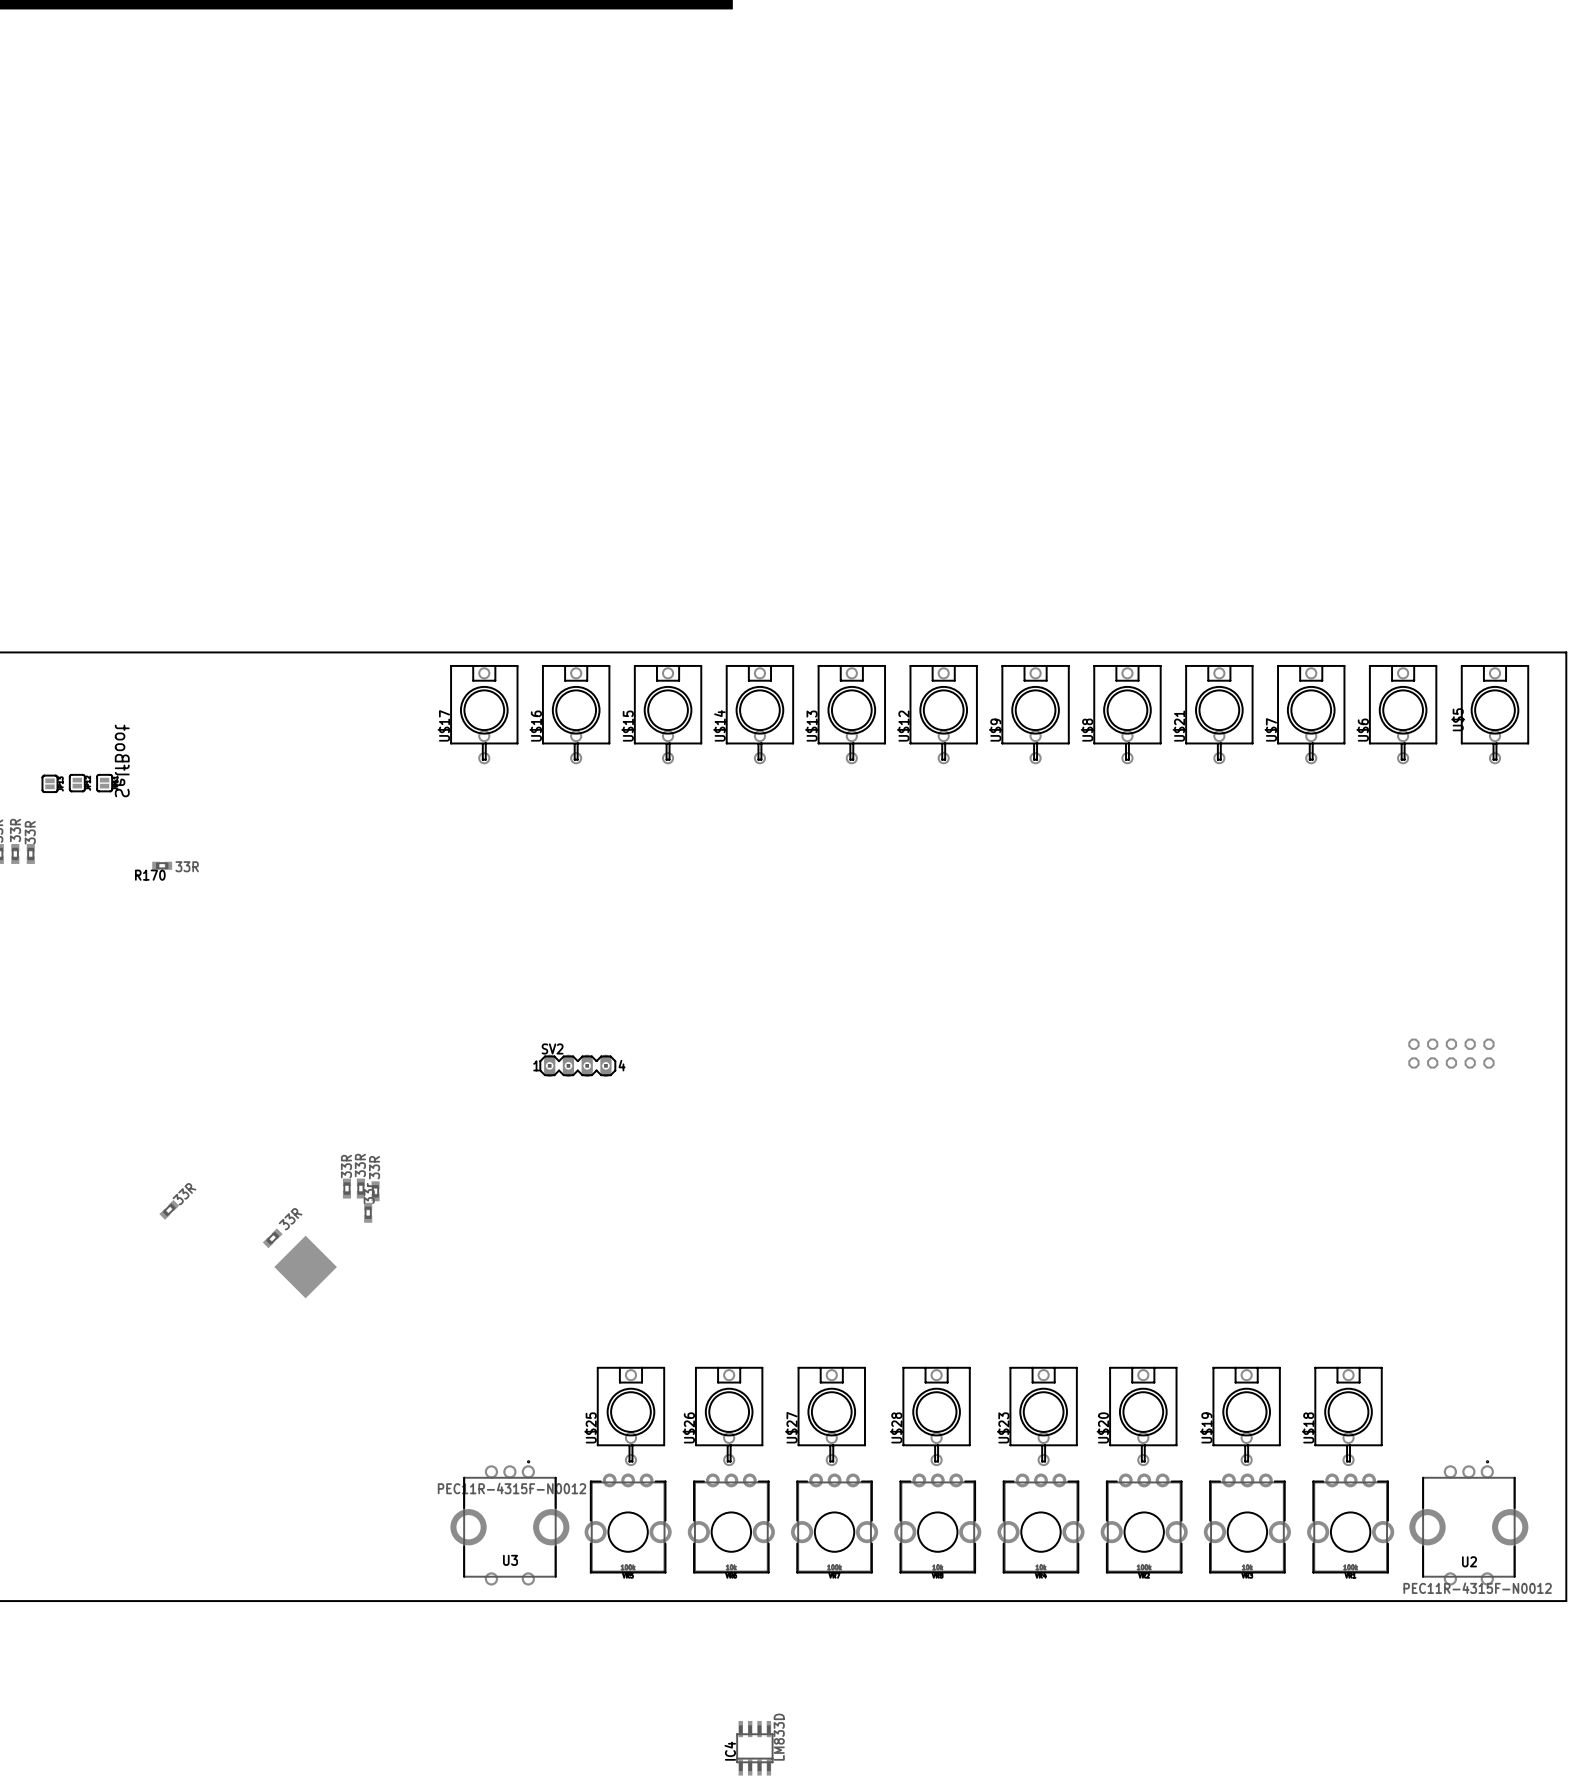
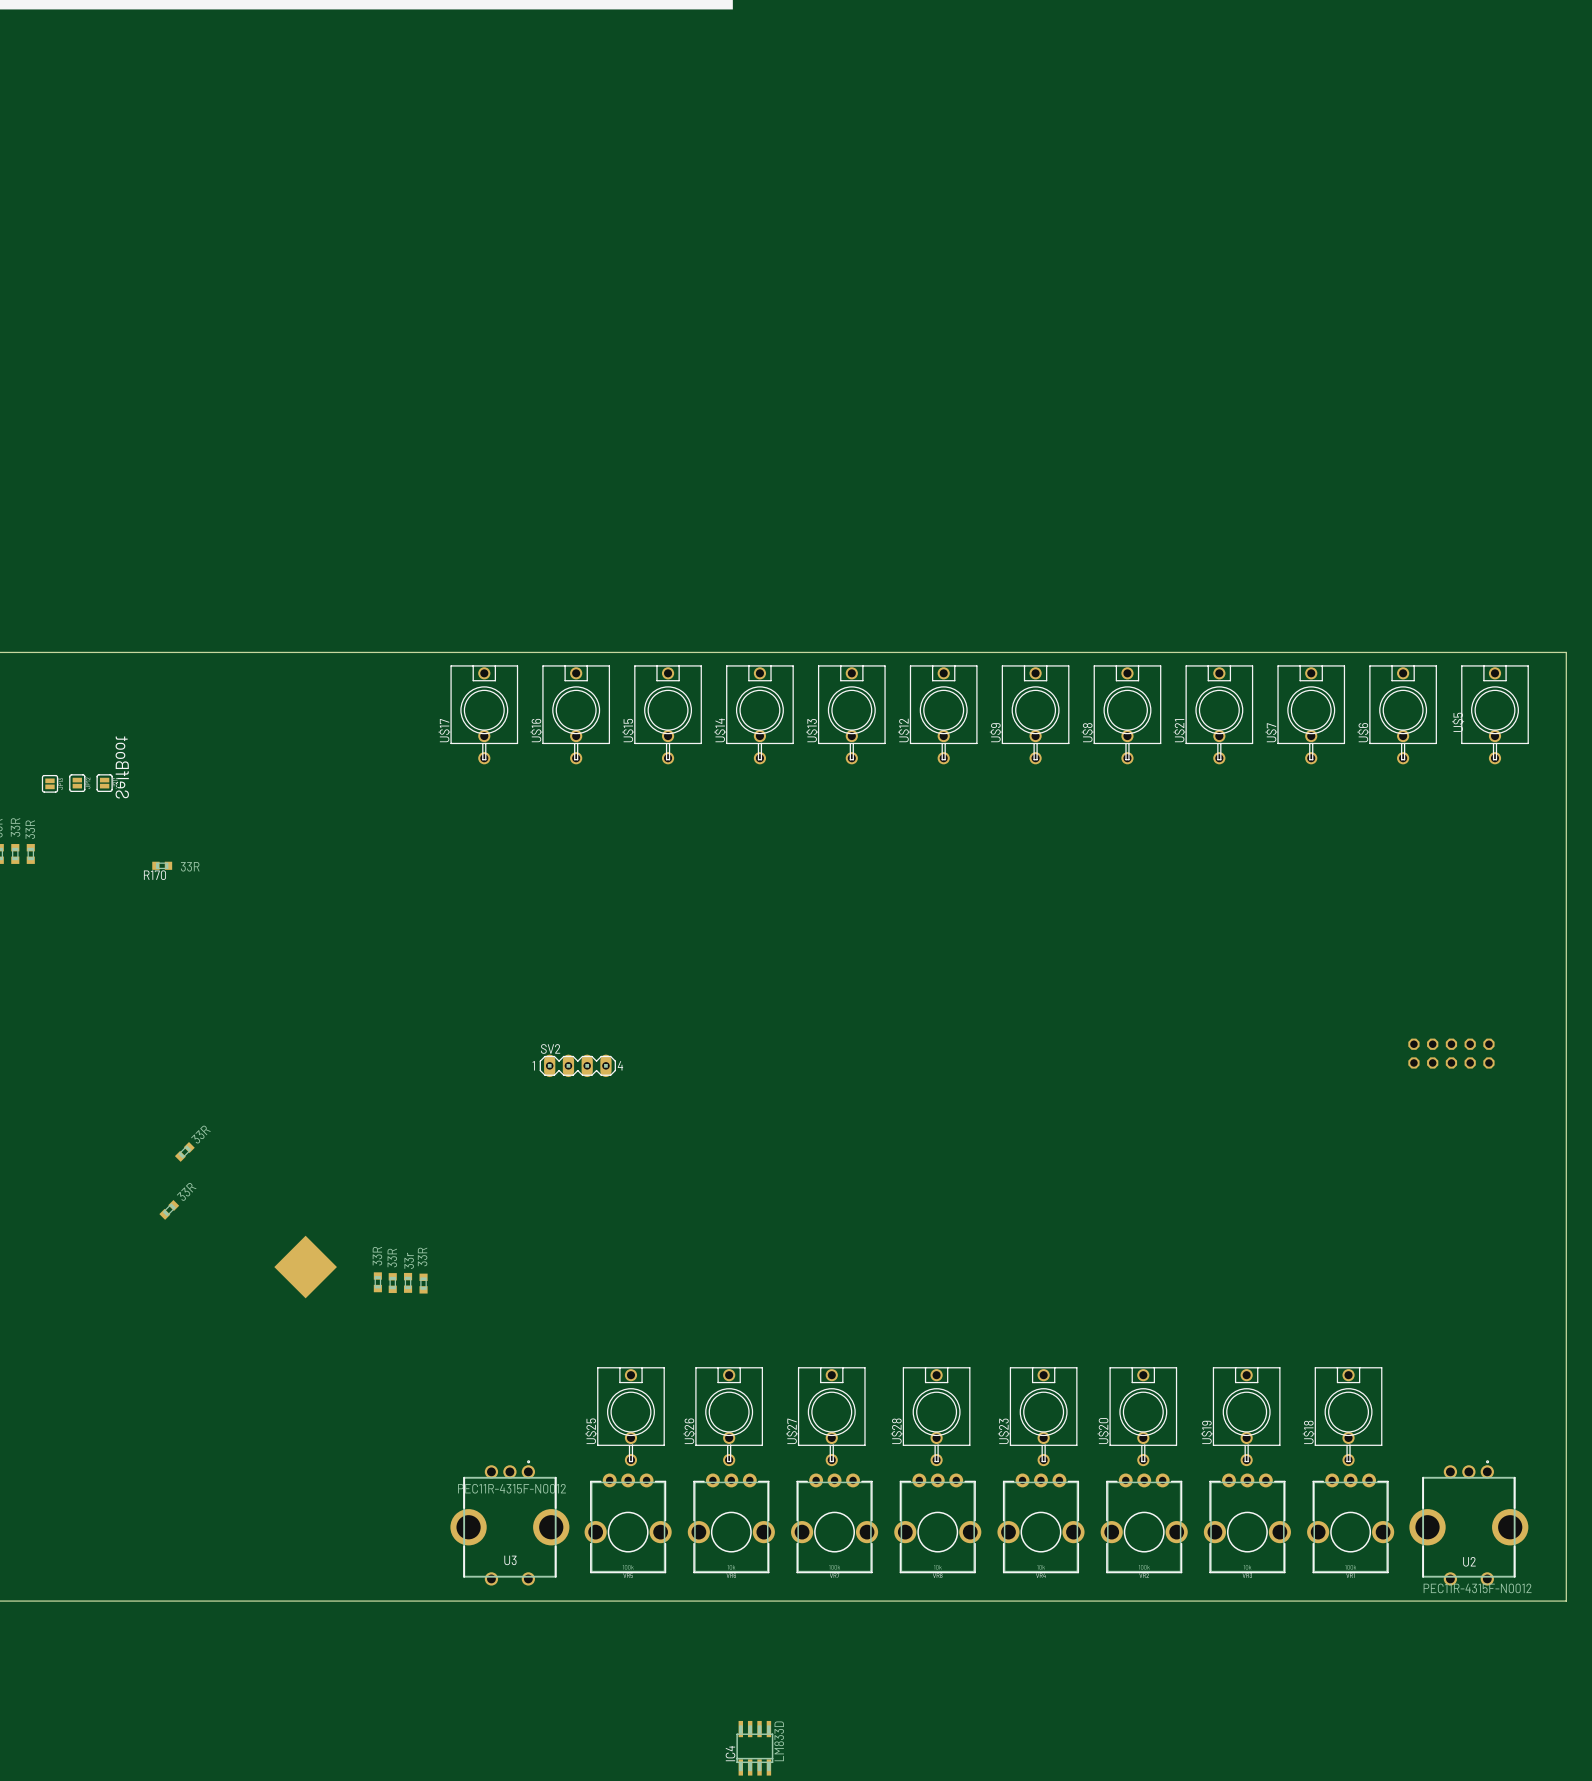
part: 33R (346, 1188) -> none
part: 33R (360, 1188) -> none
part: 33R (375, 1191) -> none
part position: (368, 1212) -> (408, 1282)
part position: (272, 1238) -> (184, 1151)
part: none -> 33R (377, 1282)
part: none -> 33R (392, 1283)
part: none -> 33R (423, 1283)

